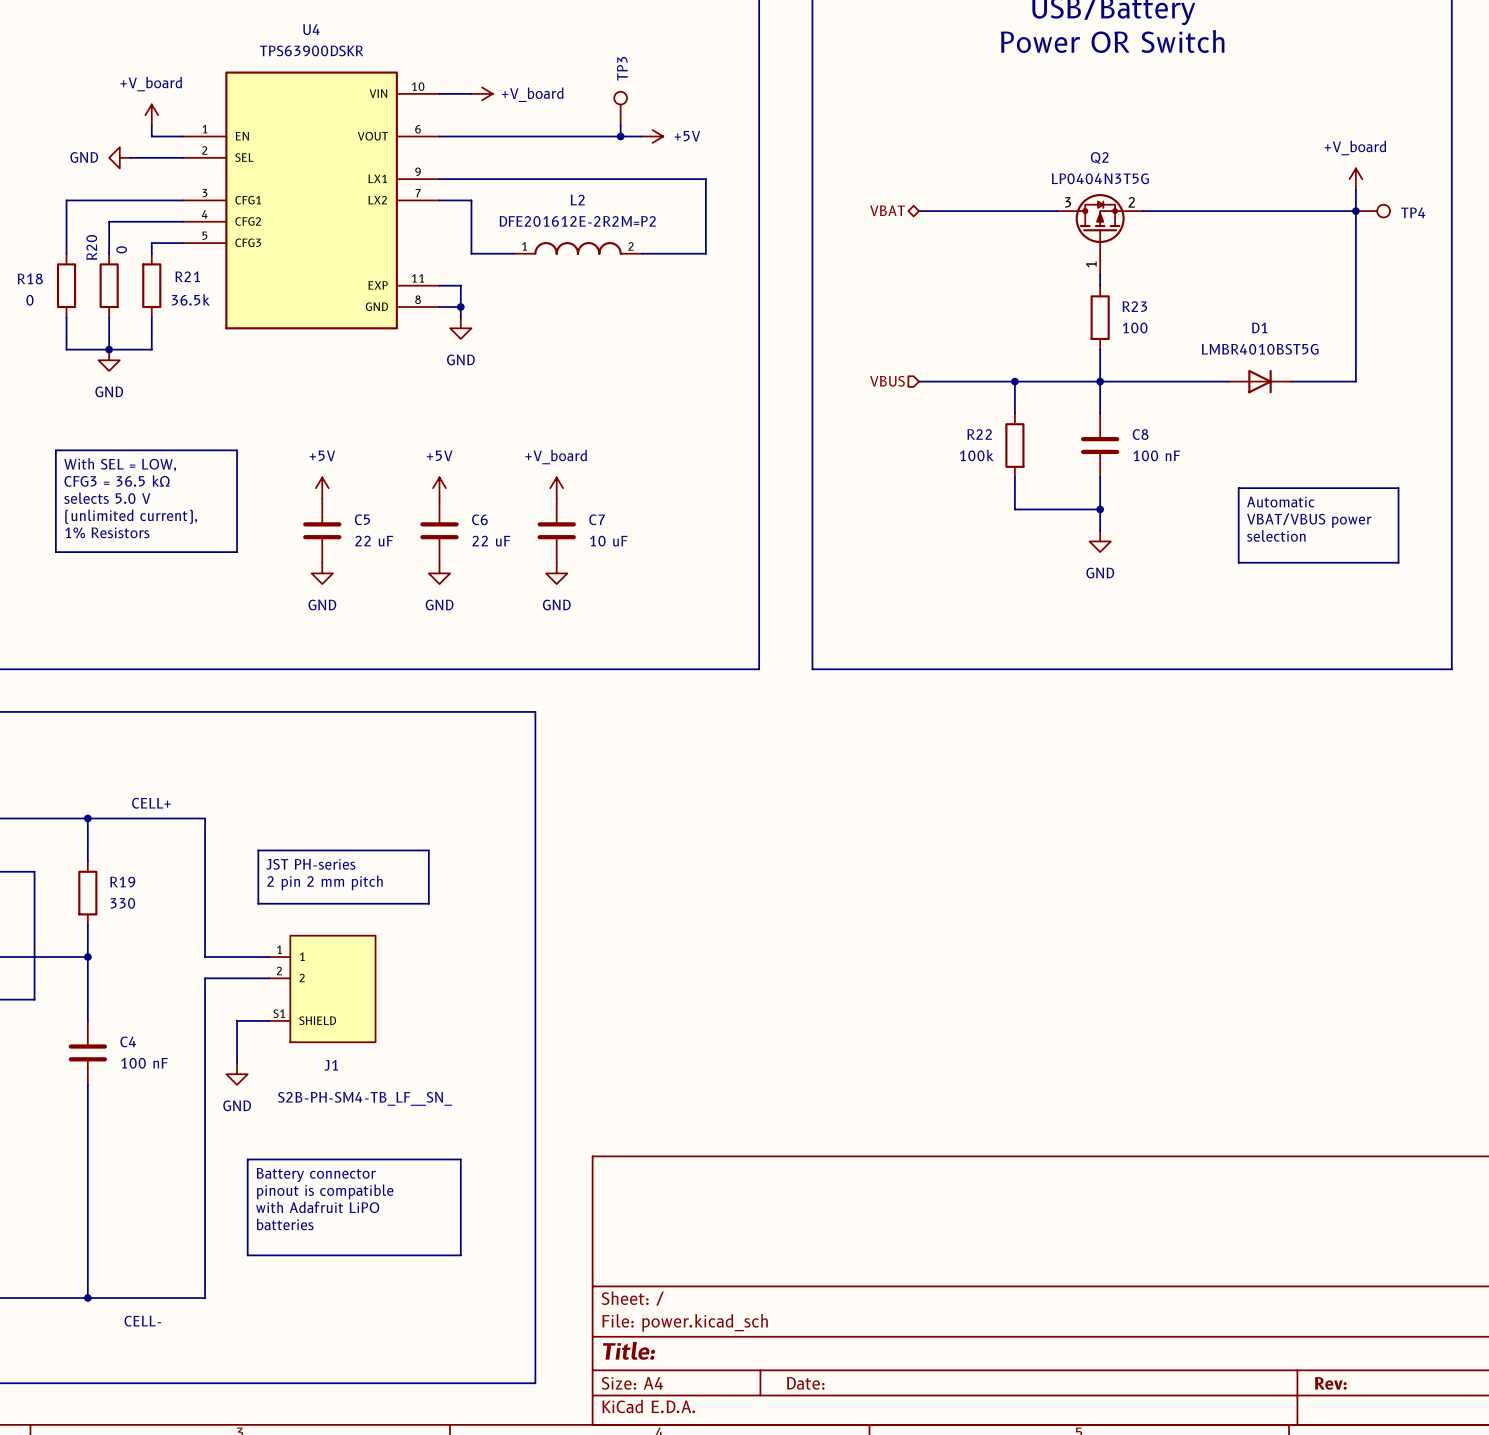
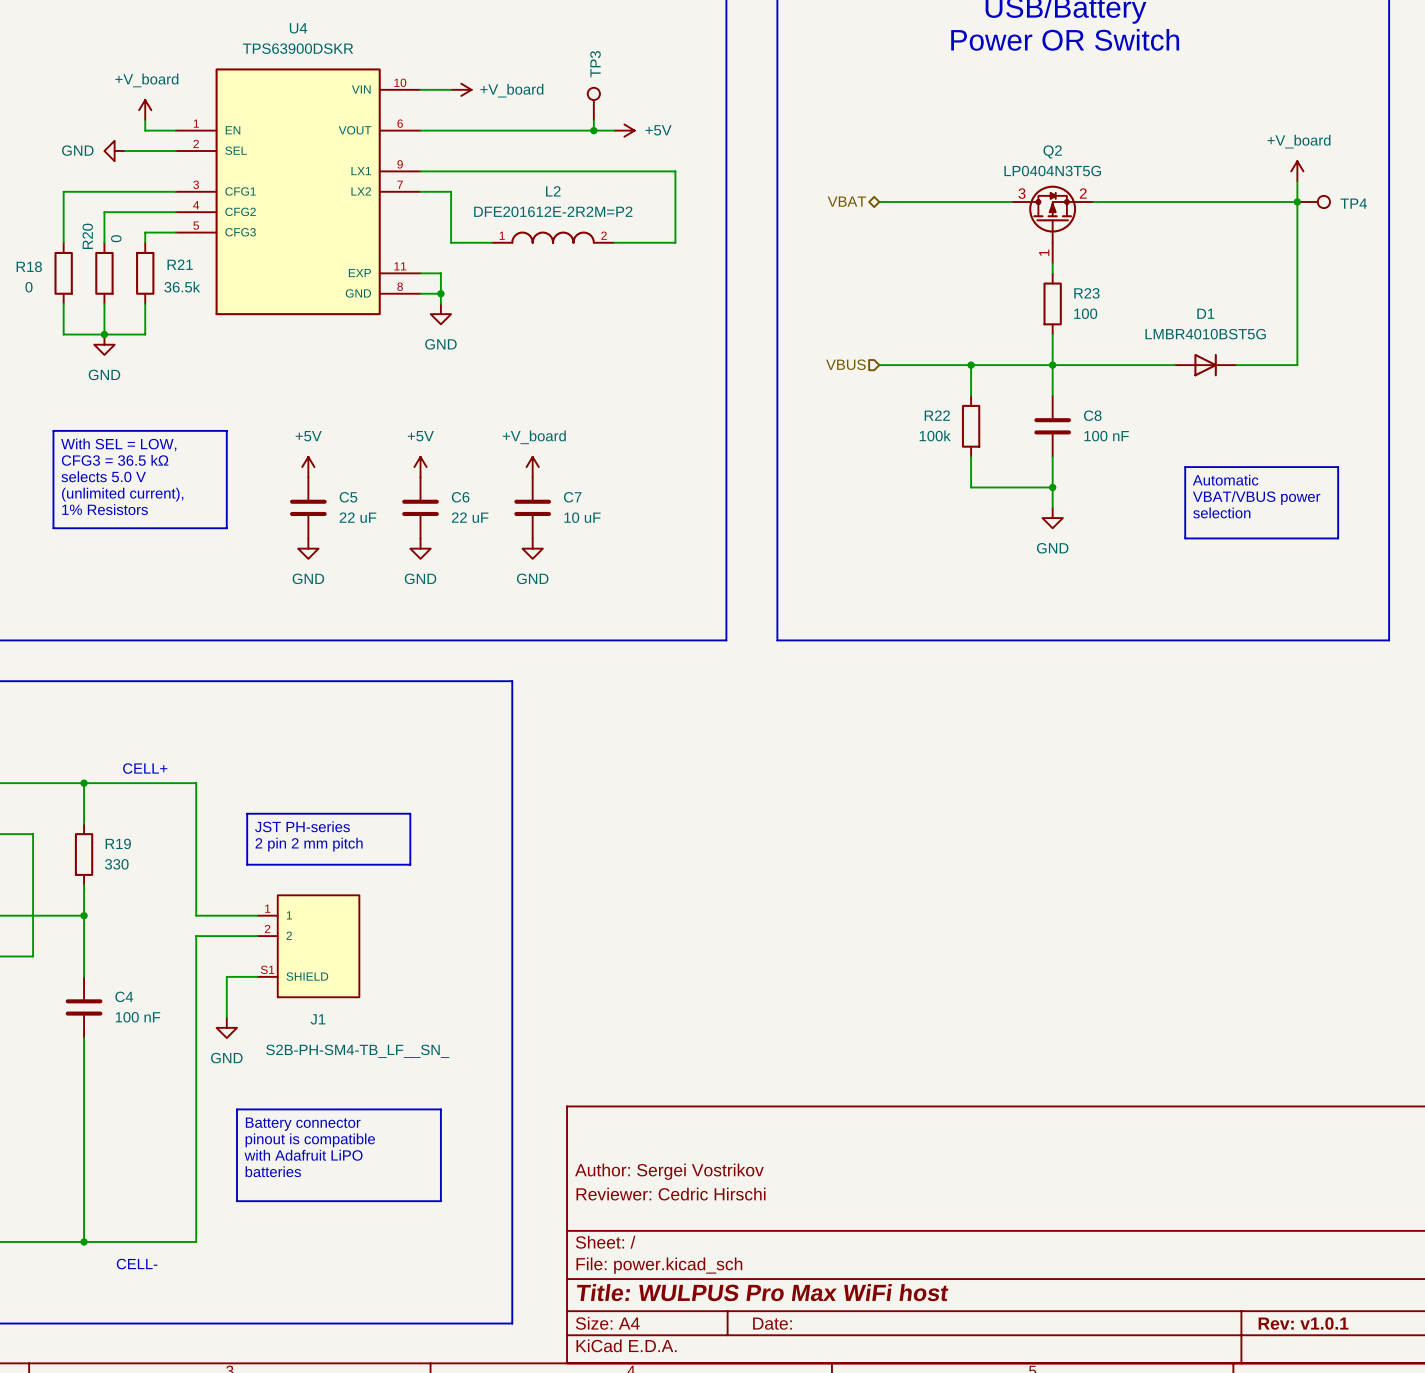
title block: none -> Author: Sergei Vostrikov (669, 1171)
title block: none -> Reviewer: Cedric Hirschi (670, 1194)
title block: Title: (629, 1350) -> Title: WULPUS Pro Max WiFi host (762, 1292)
title block: Rev: (1330, 1383) -> Rev: v1.0.1 (1303, 1323)

